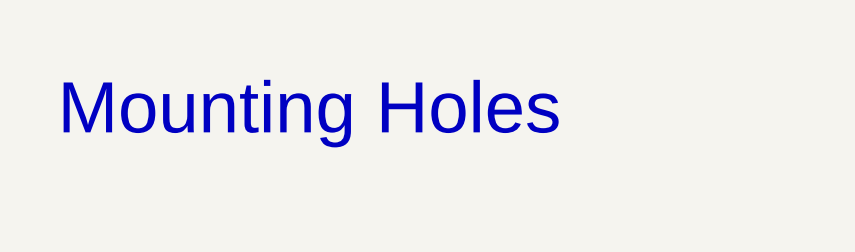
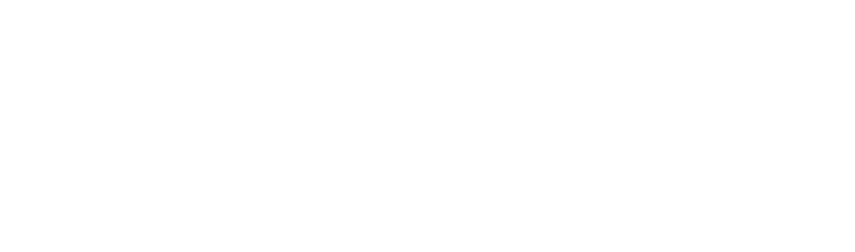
text: Mounting Holes (311, 113) -> none

